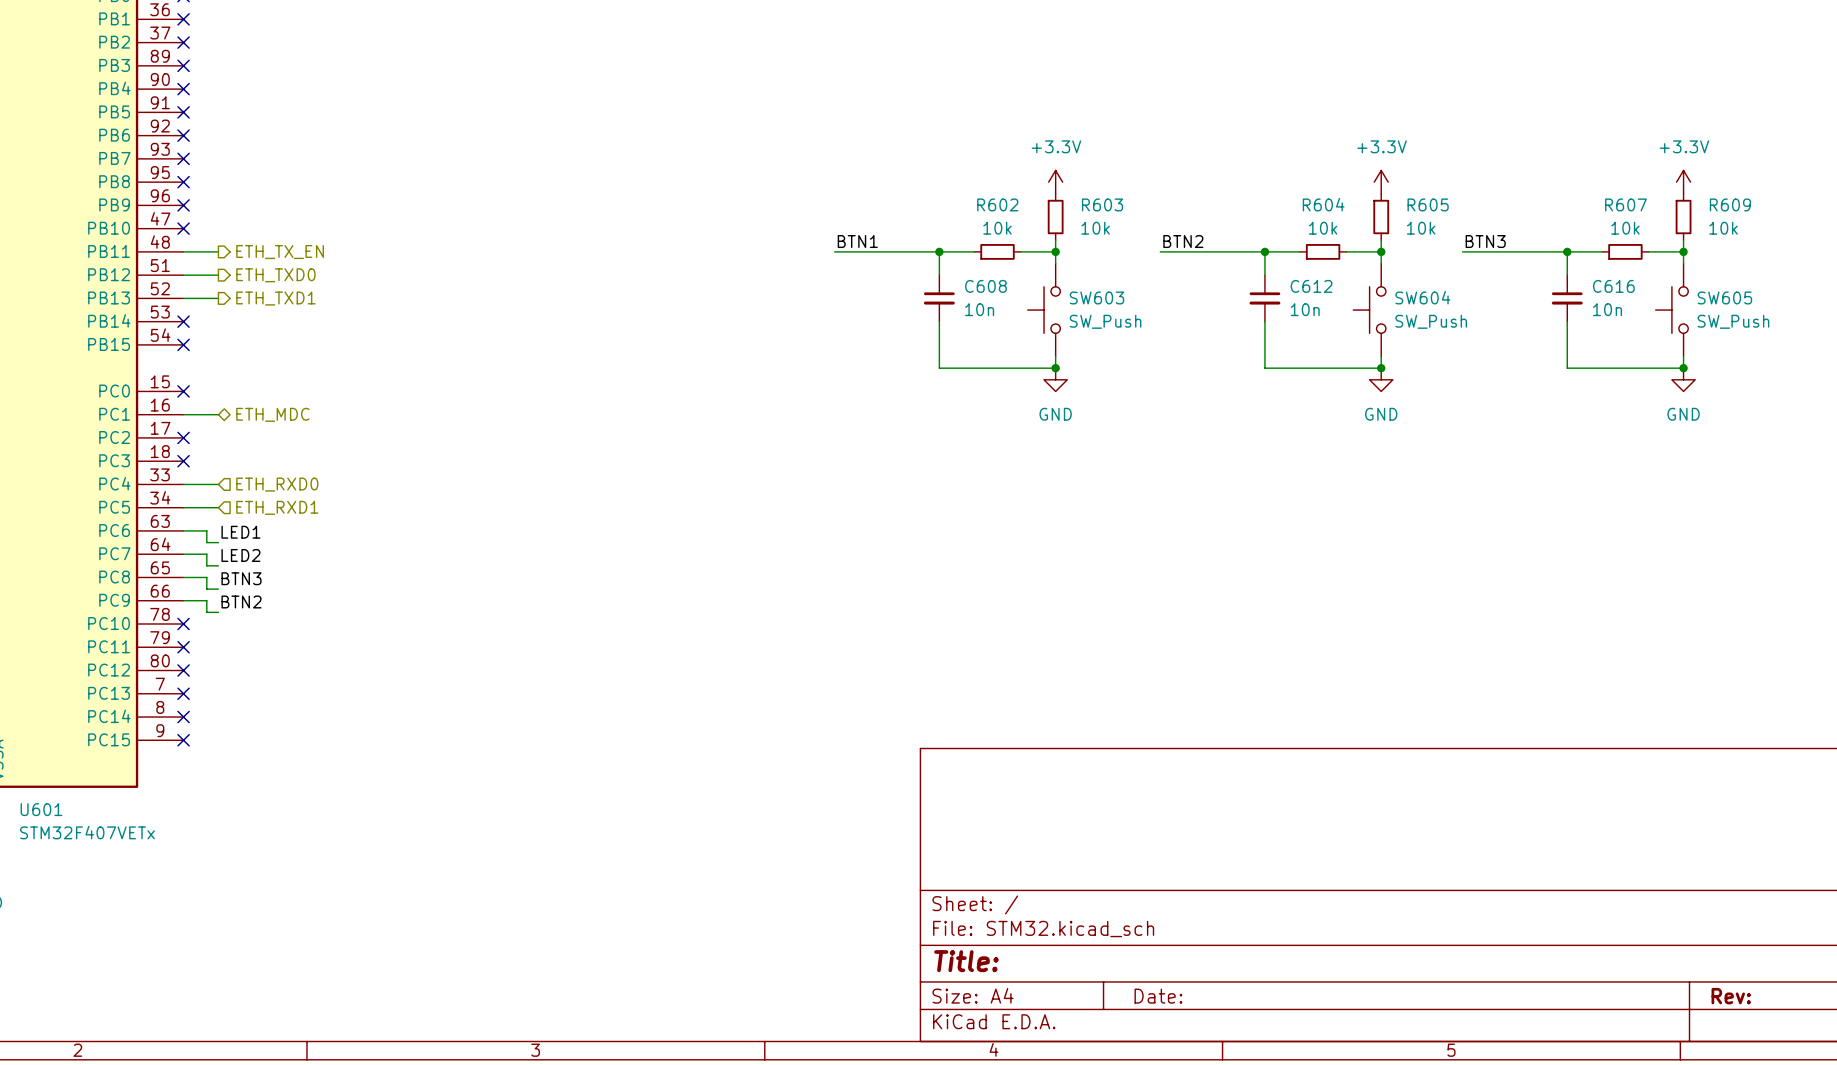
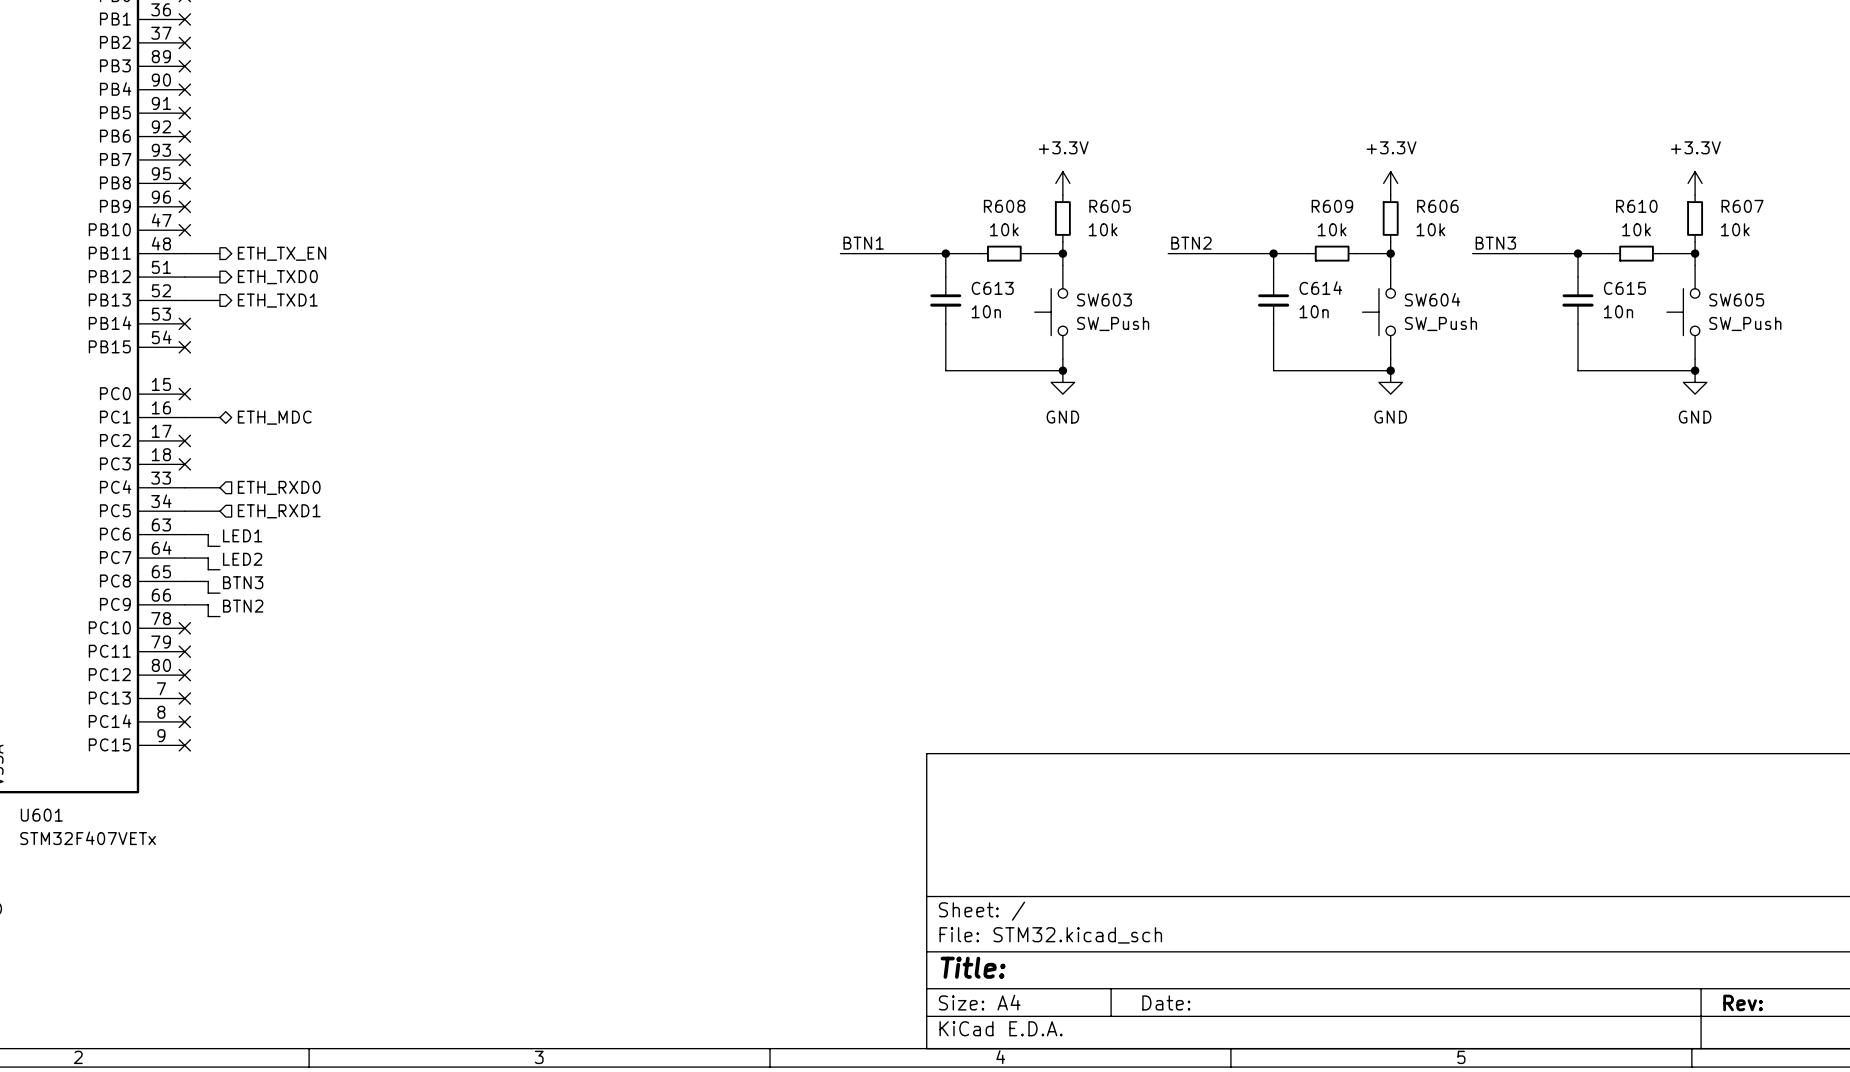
R602 name: R602 (997, 204) -> R608 (1004, 206)
R603 name: R603 (1102, 204) -> R605 (1110, 206)
R604 name: R604 (1323, 204) -> R609 (1332, 206)
R605 name: R605 (1428, 204) -> R606 (1437, 206)
R607 name: R607 (1625, 204) -> R610 (1636, 206)
R609 name: R609 (1730, 204) -> R607 (1742, 206)
C608 name: C608 (985, 286) -> C613 (992, 288)
C612 name: C612 (1311, 286) -> C614 (1320, 288)
C616 name: C616 (1613, 286) -> C615 (1624, 288)

